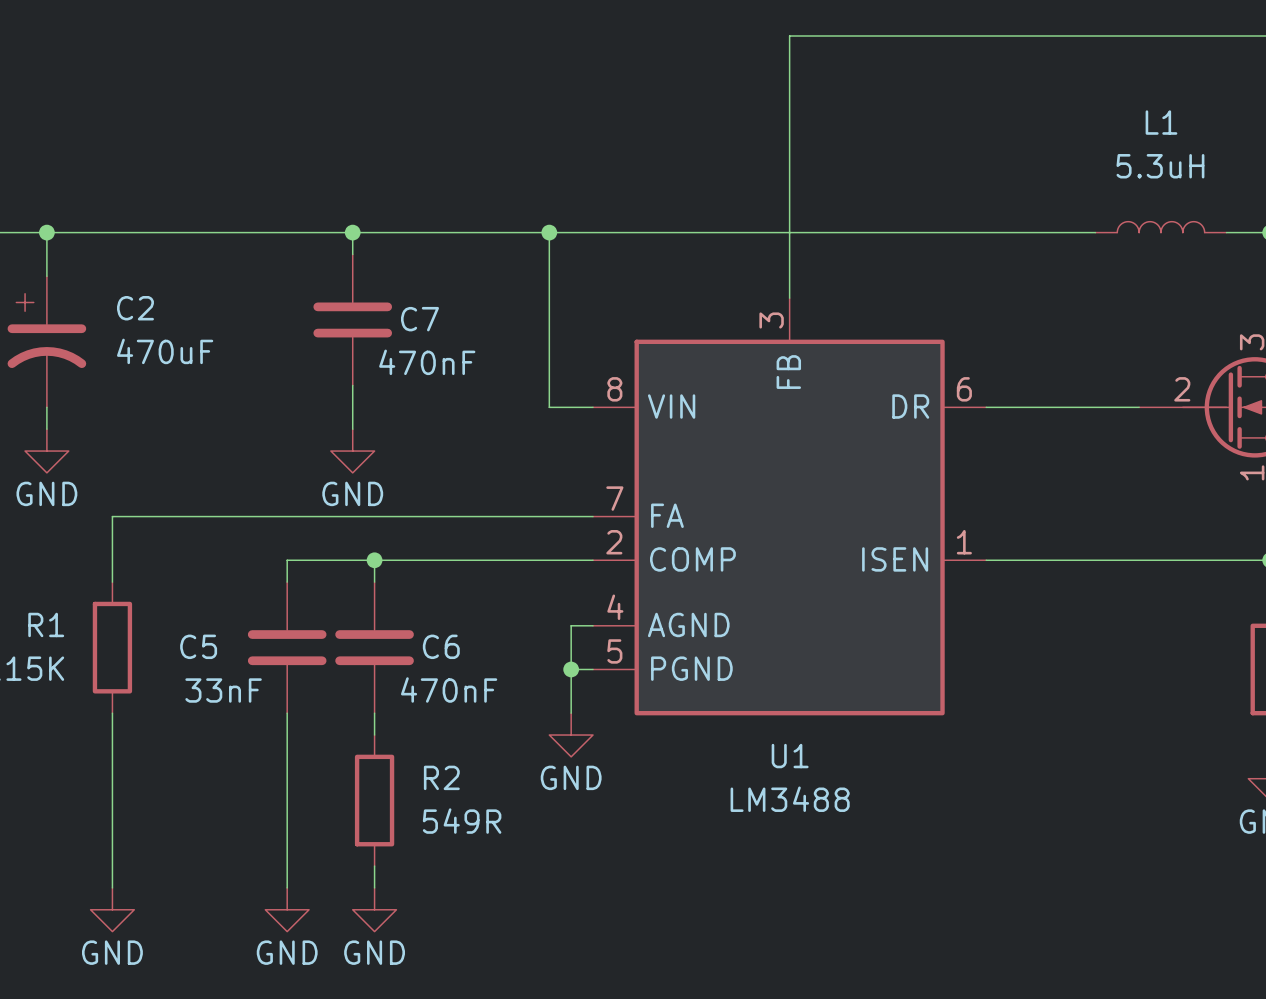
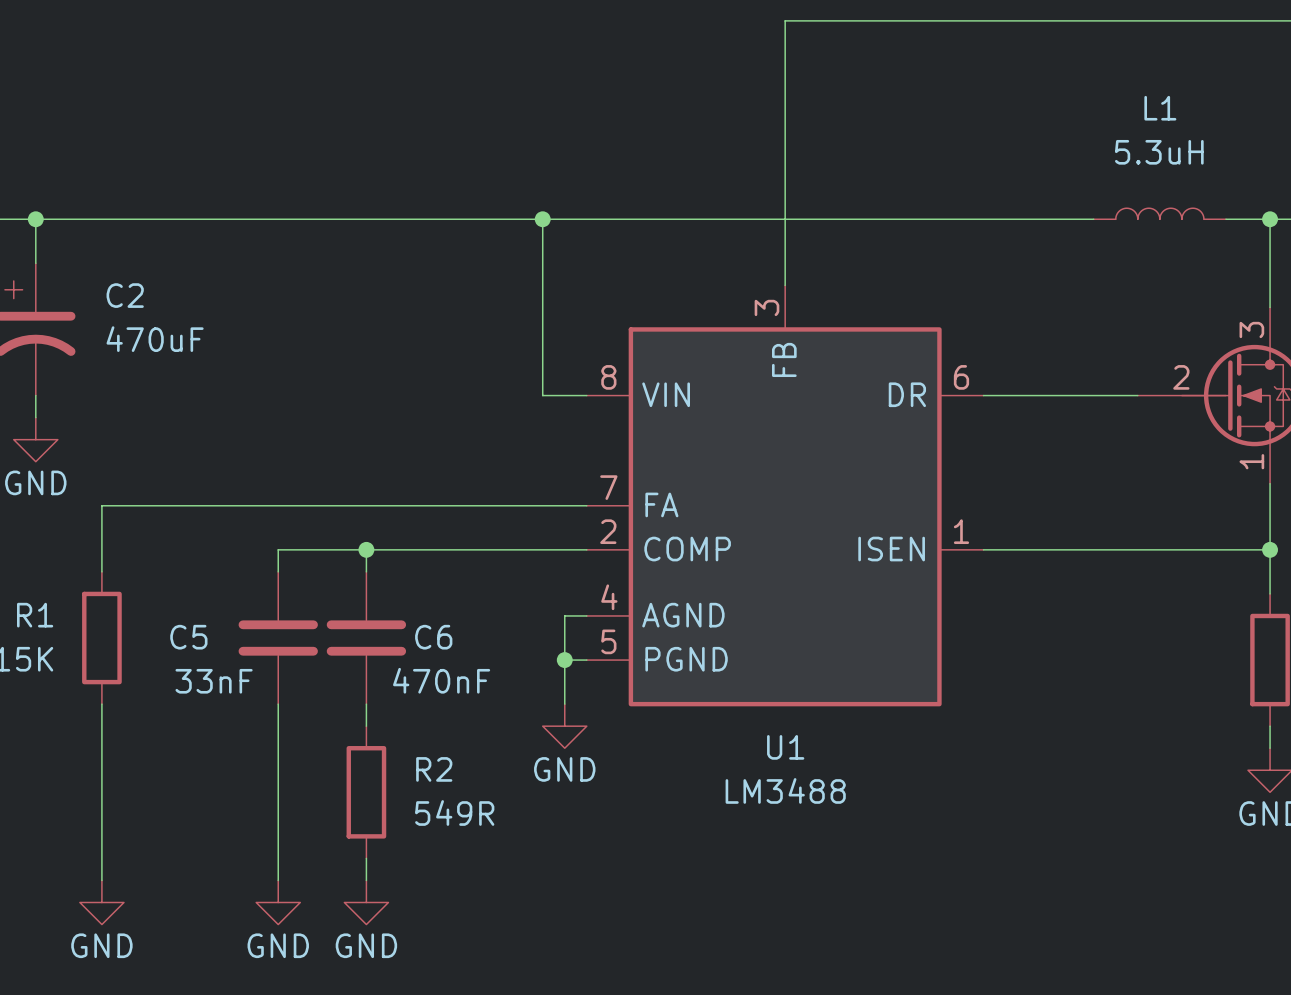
wire: (352, 232) (352, 254) -> none
junction: (352, 232) -> none
C7: 470nF (352, 319) -> none
wire: (352, 385) (352, 429) -> none
power symbol: GND (352, 451) -> none

